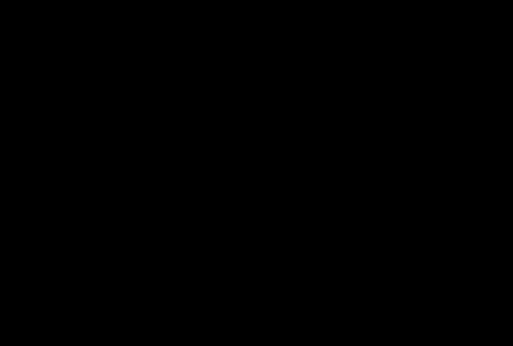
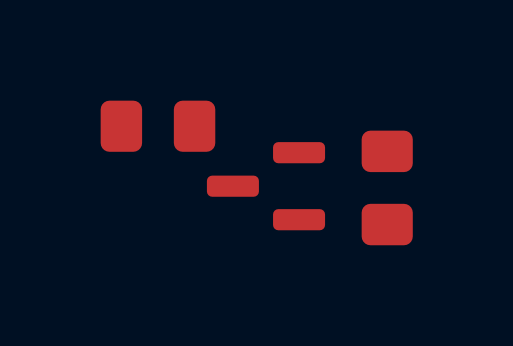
part: none -> (157, 126)
part: none -> (265, 186)
part: none -> (387, 187)

